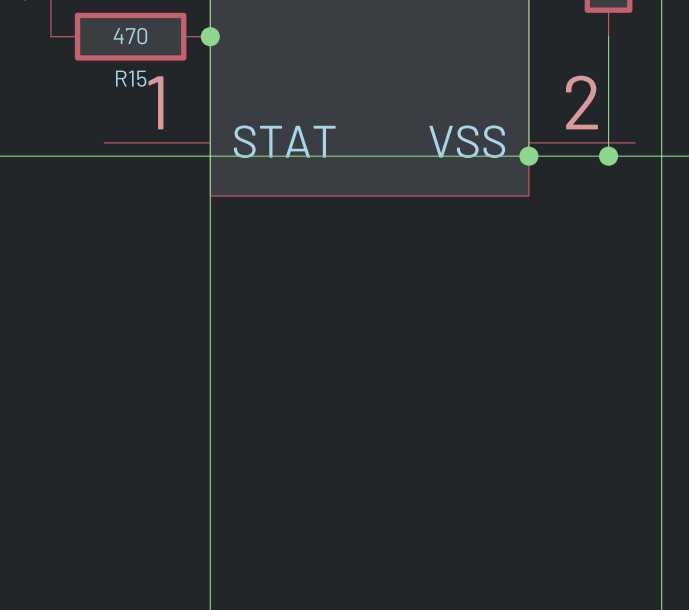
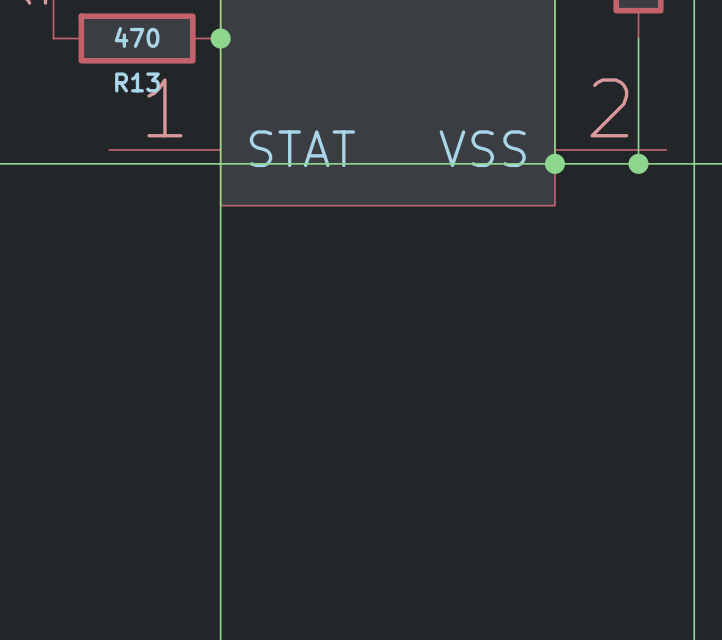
R15 name: R15 (131, 78) -> R13 (137, 82)

